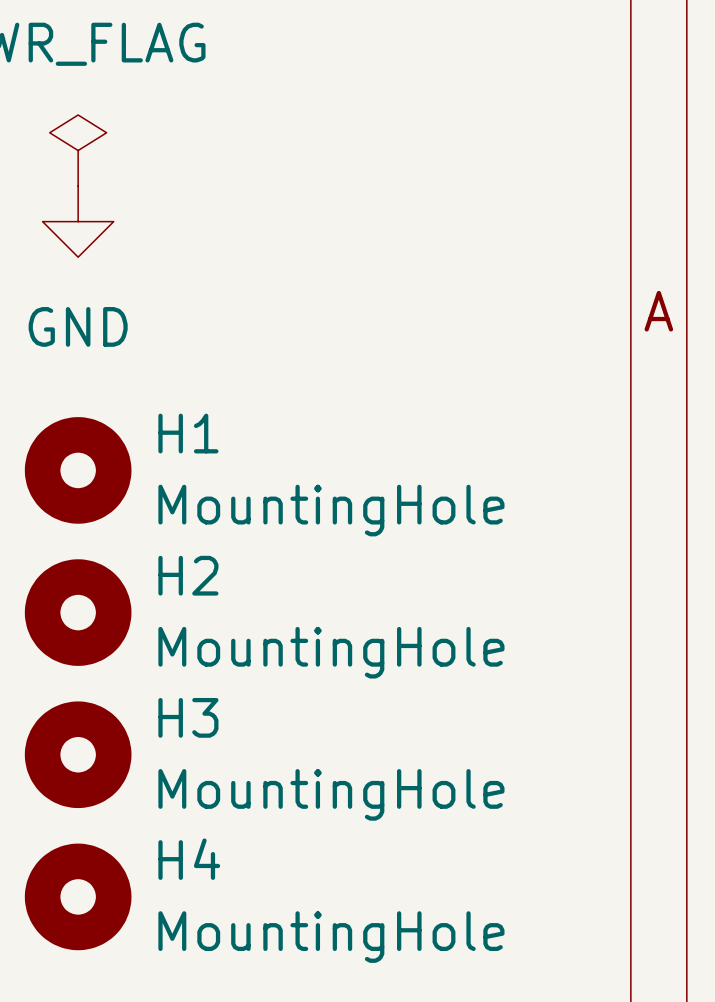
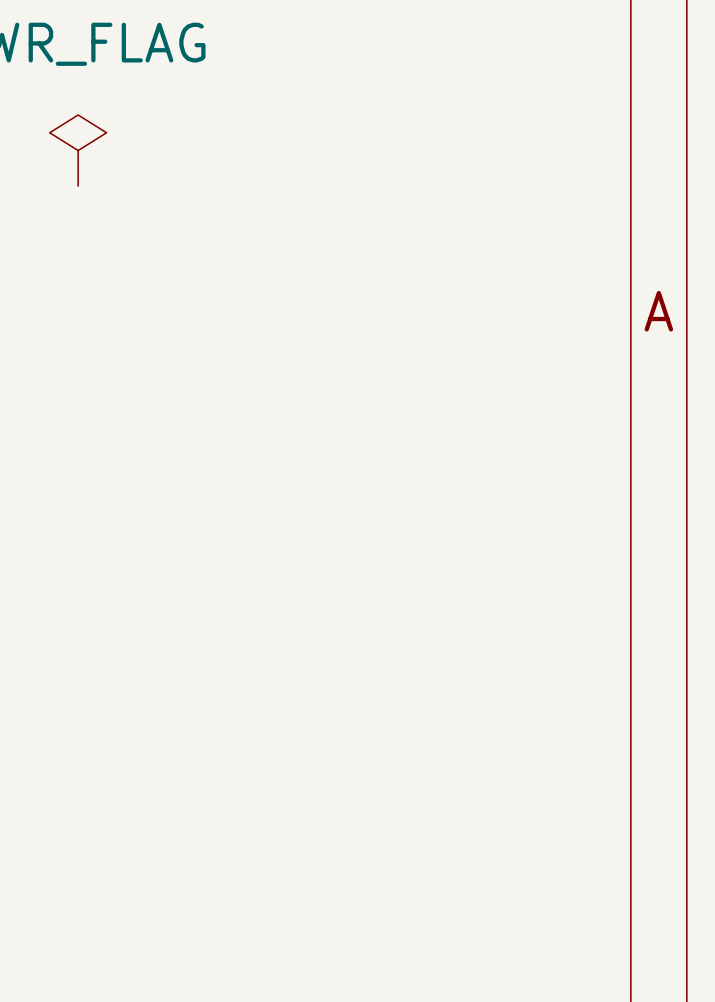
power symbol: GND (78, 221) -> none
H1: MountingHole (78, 470) -> none
H2: MountingHole (78, 612) -> none
H3: MountingHole (78, 754) -> none
H4: MountingHole (78, 896) -> none

